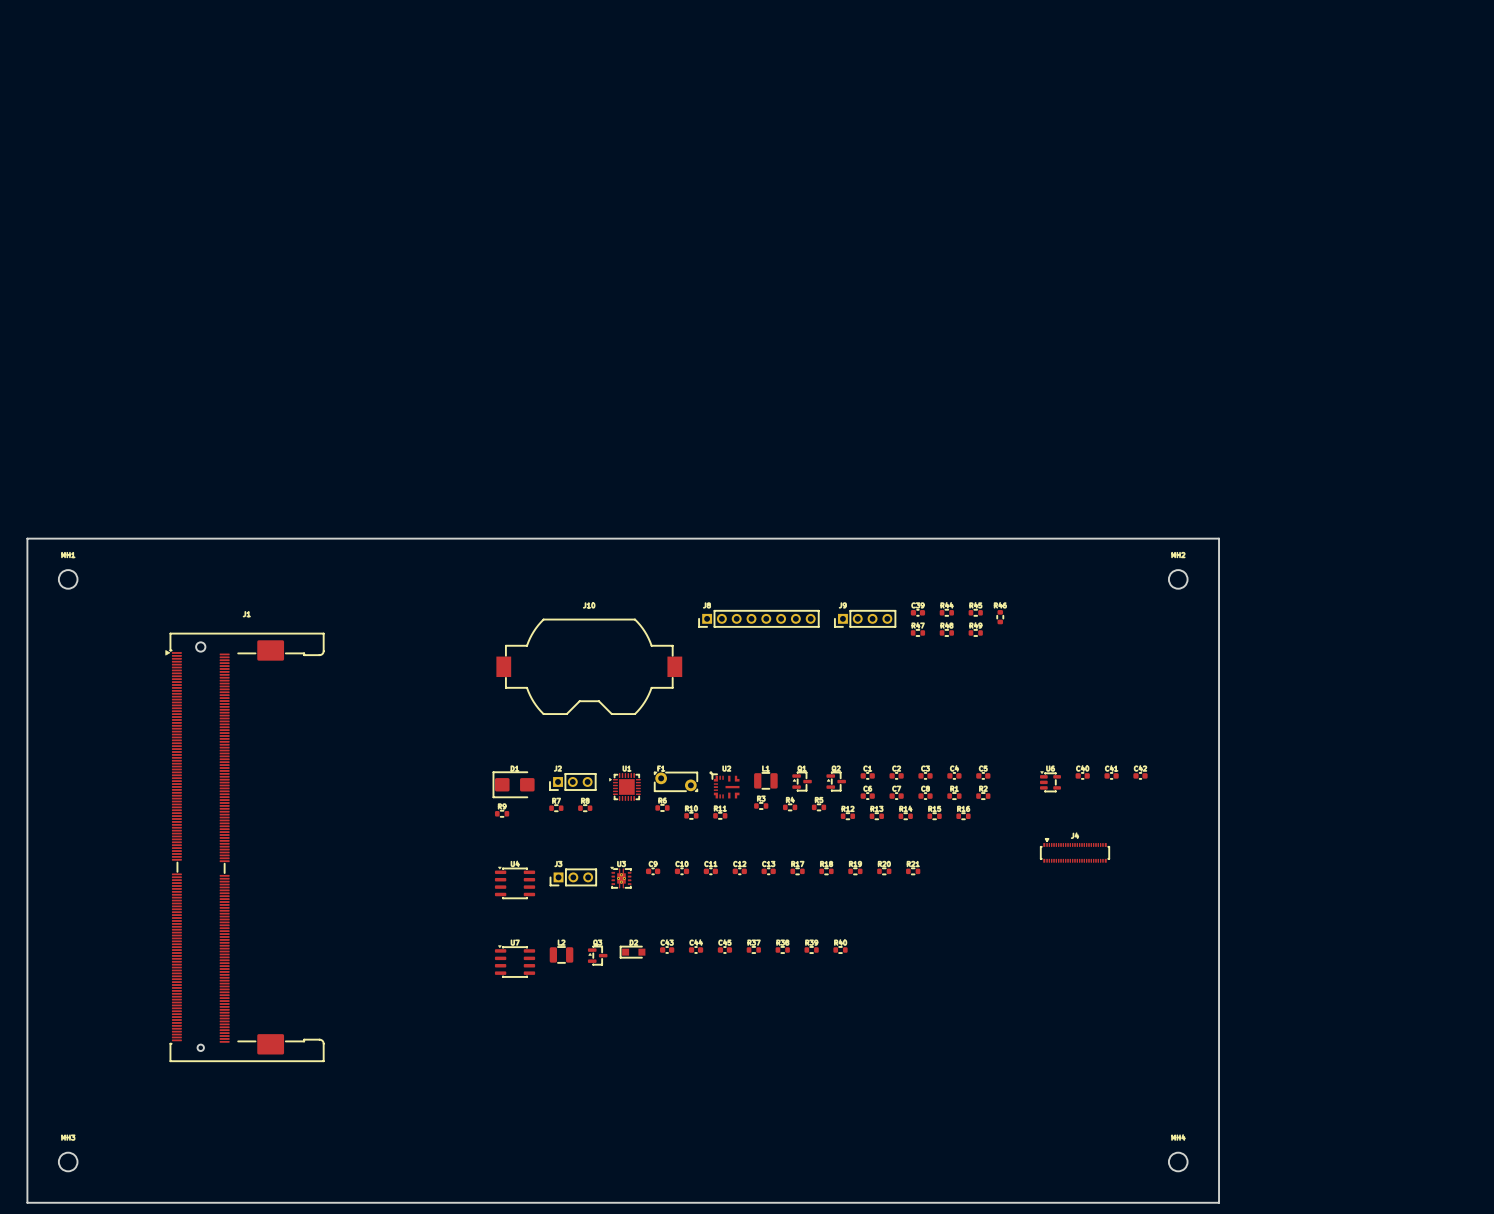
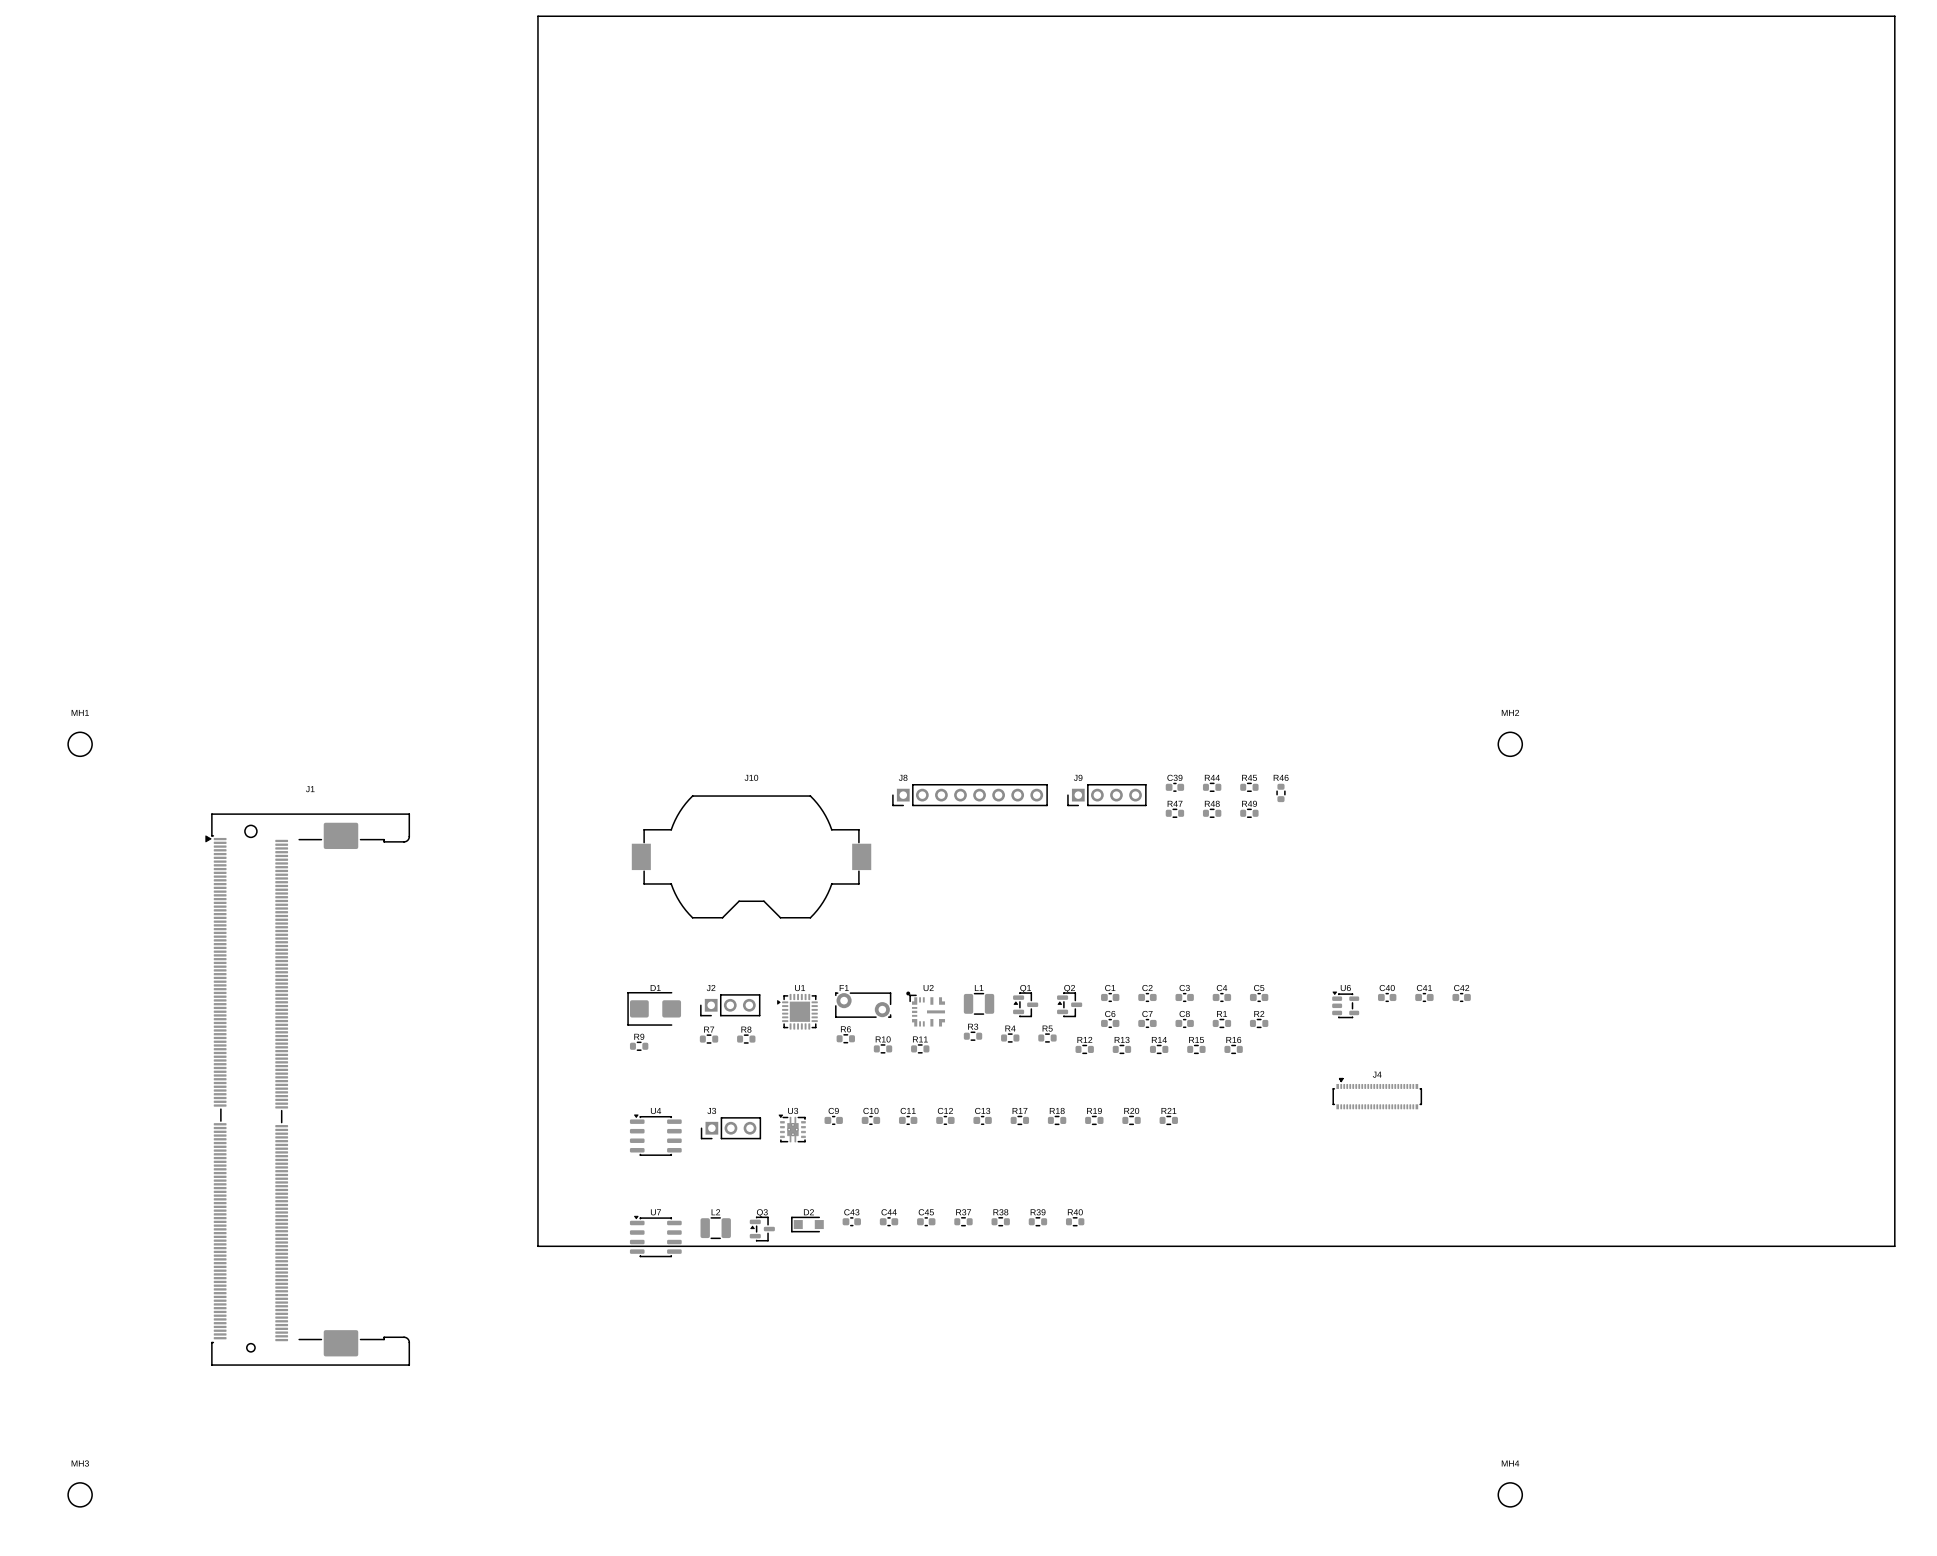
board edge: none -> (537, 16) (1894, 16) (1894, 1246) (537, 1246) (537, 16)
board edge: (27, 538) (1219, 538) (1219, 1202) (27, 1202) (27, 538) -> none

